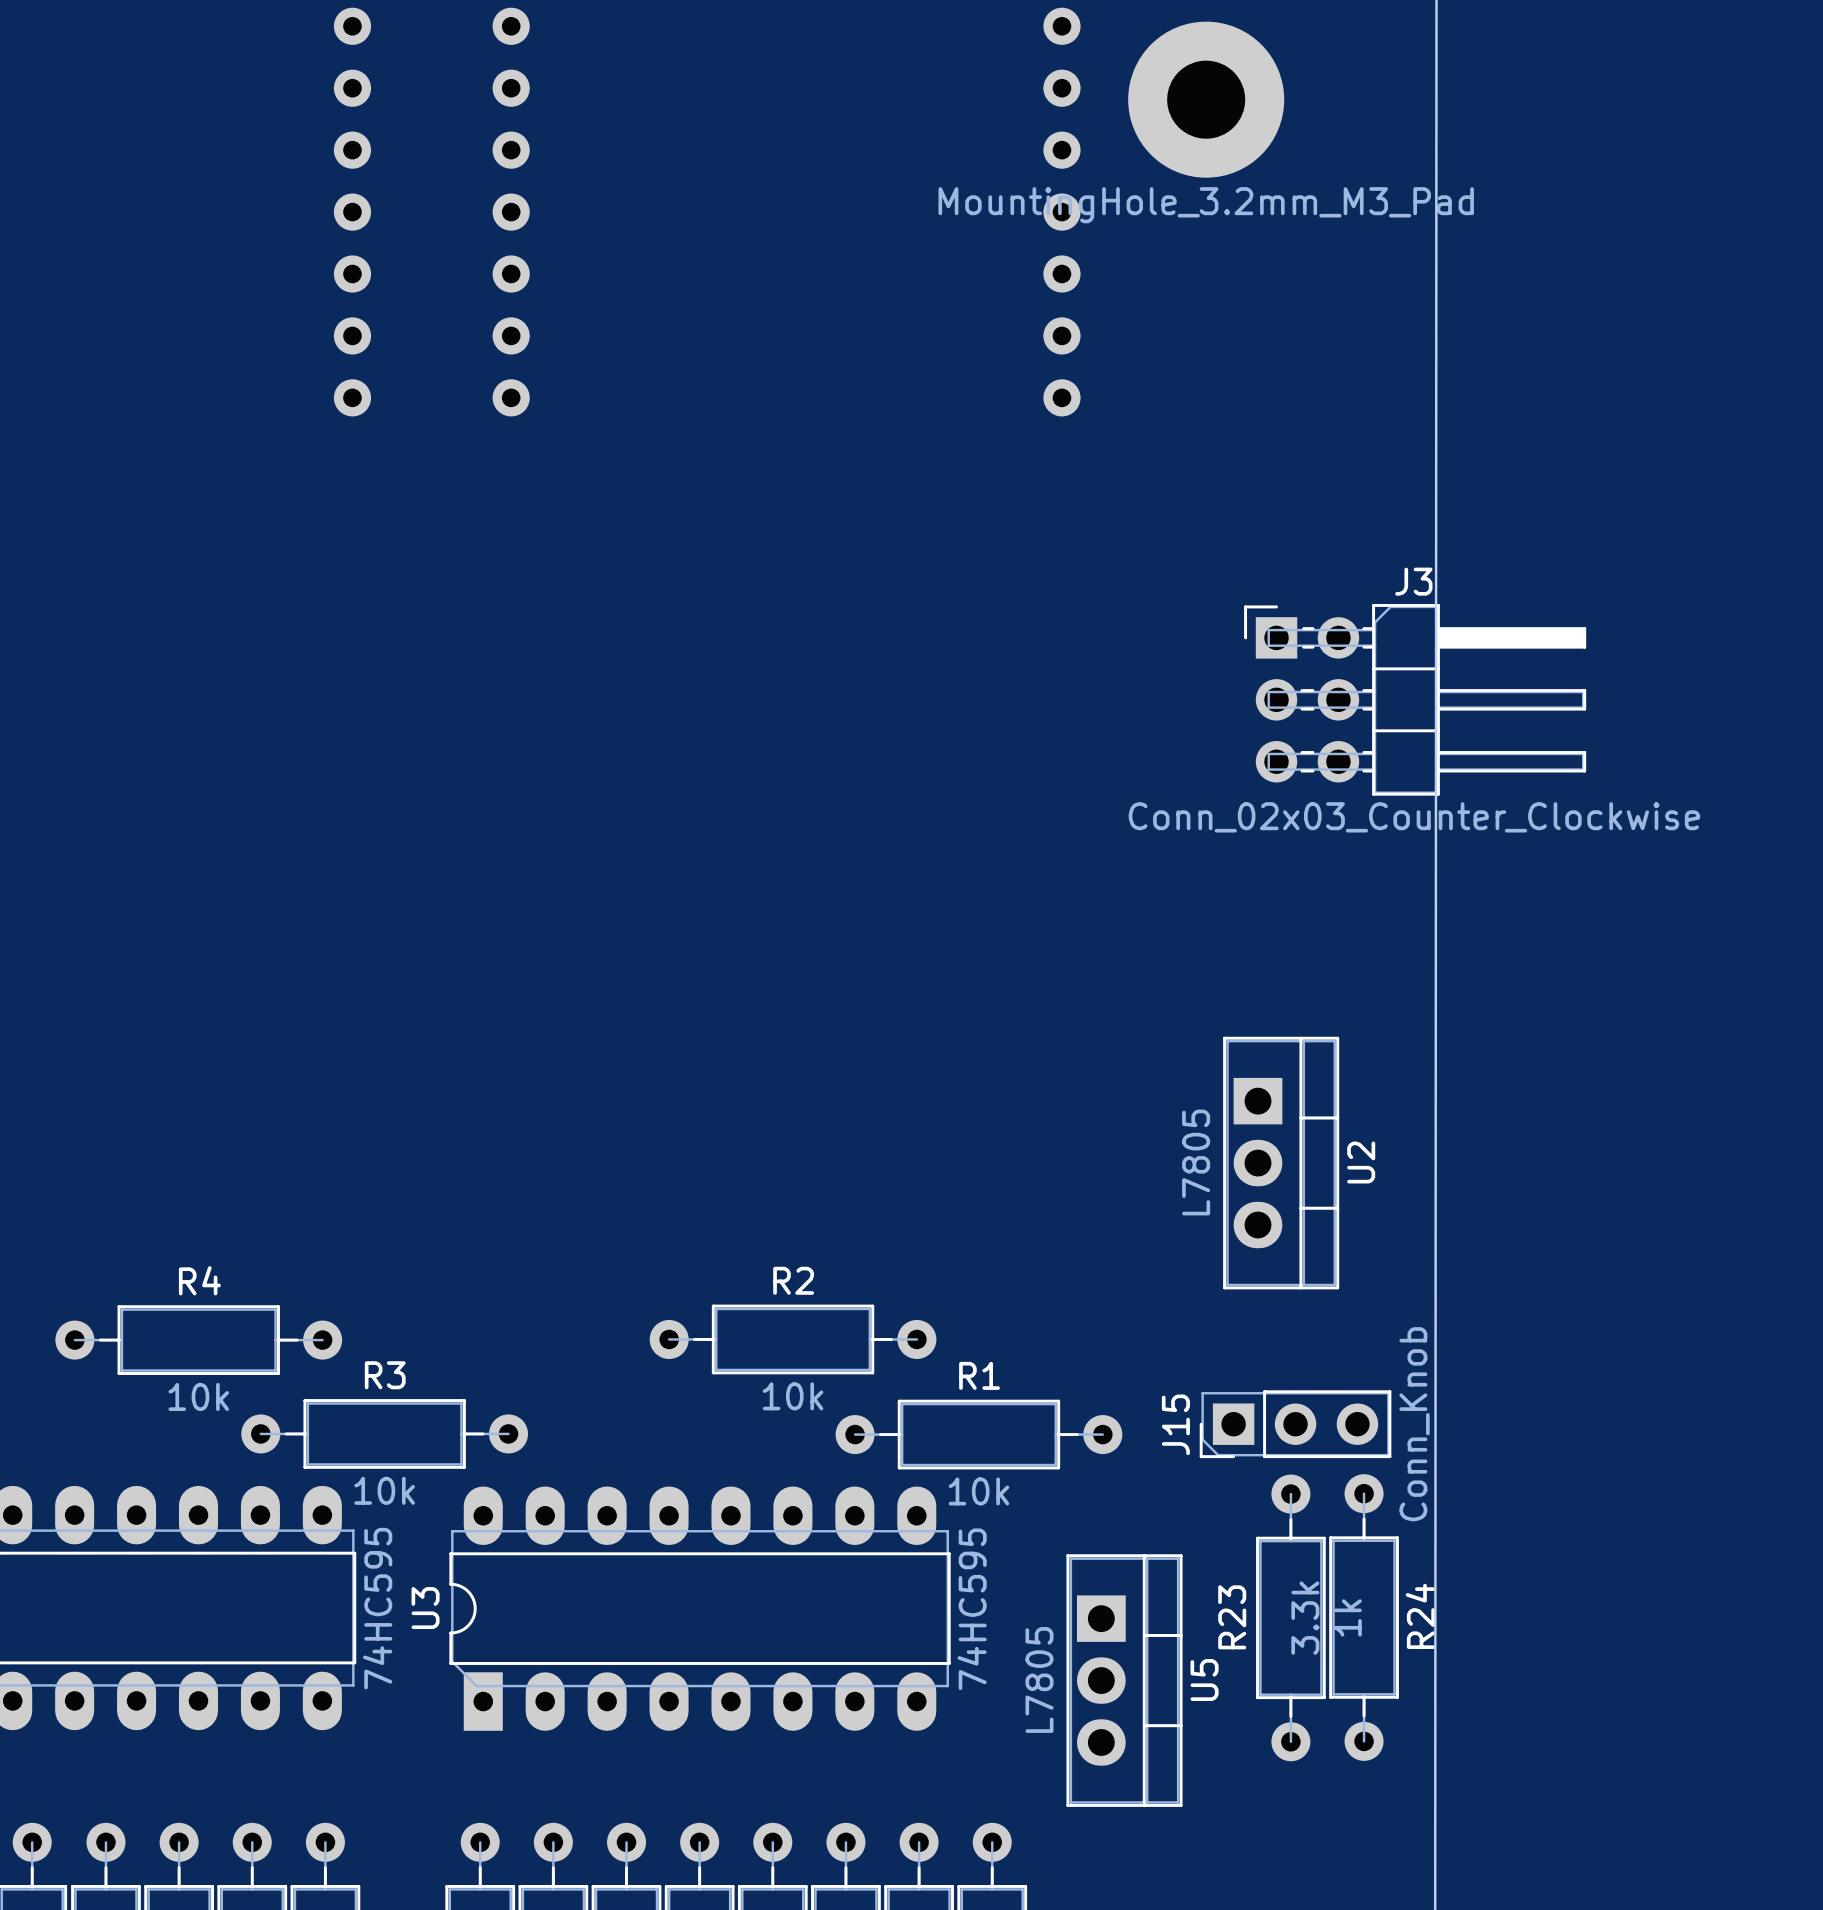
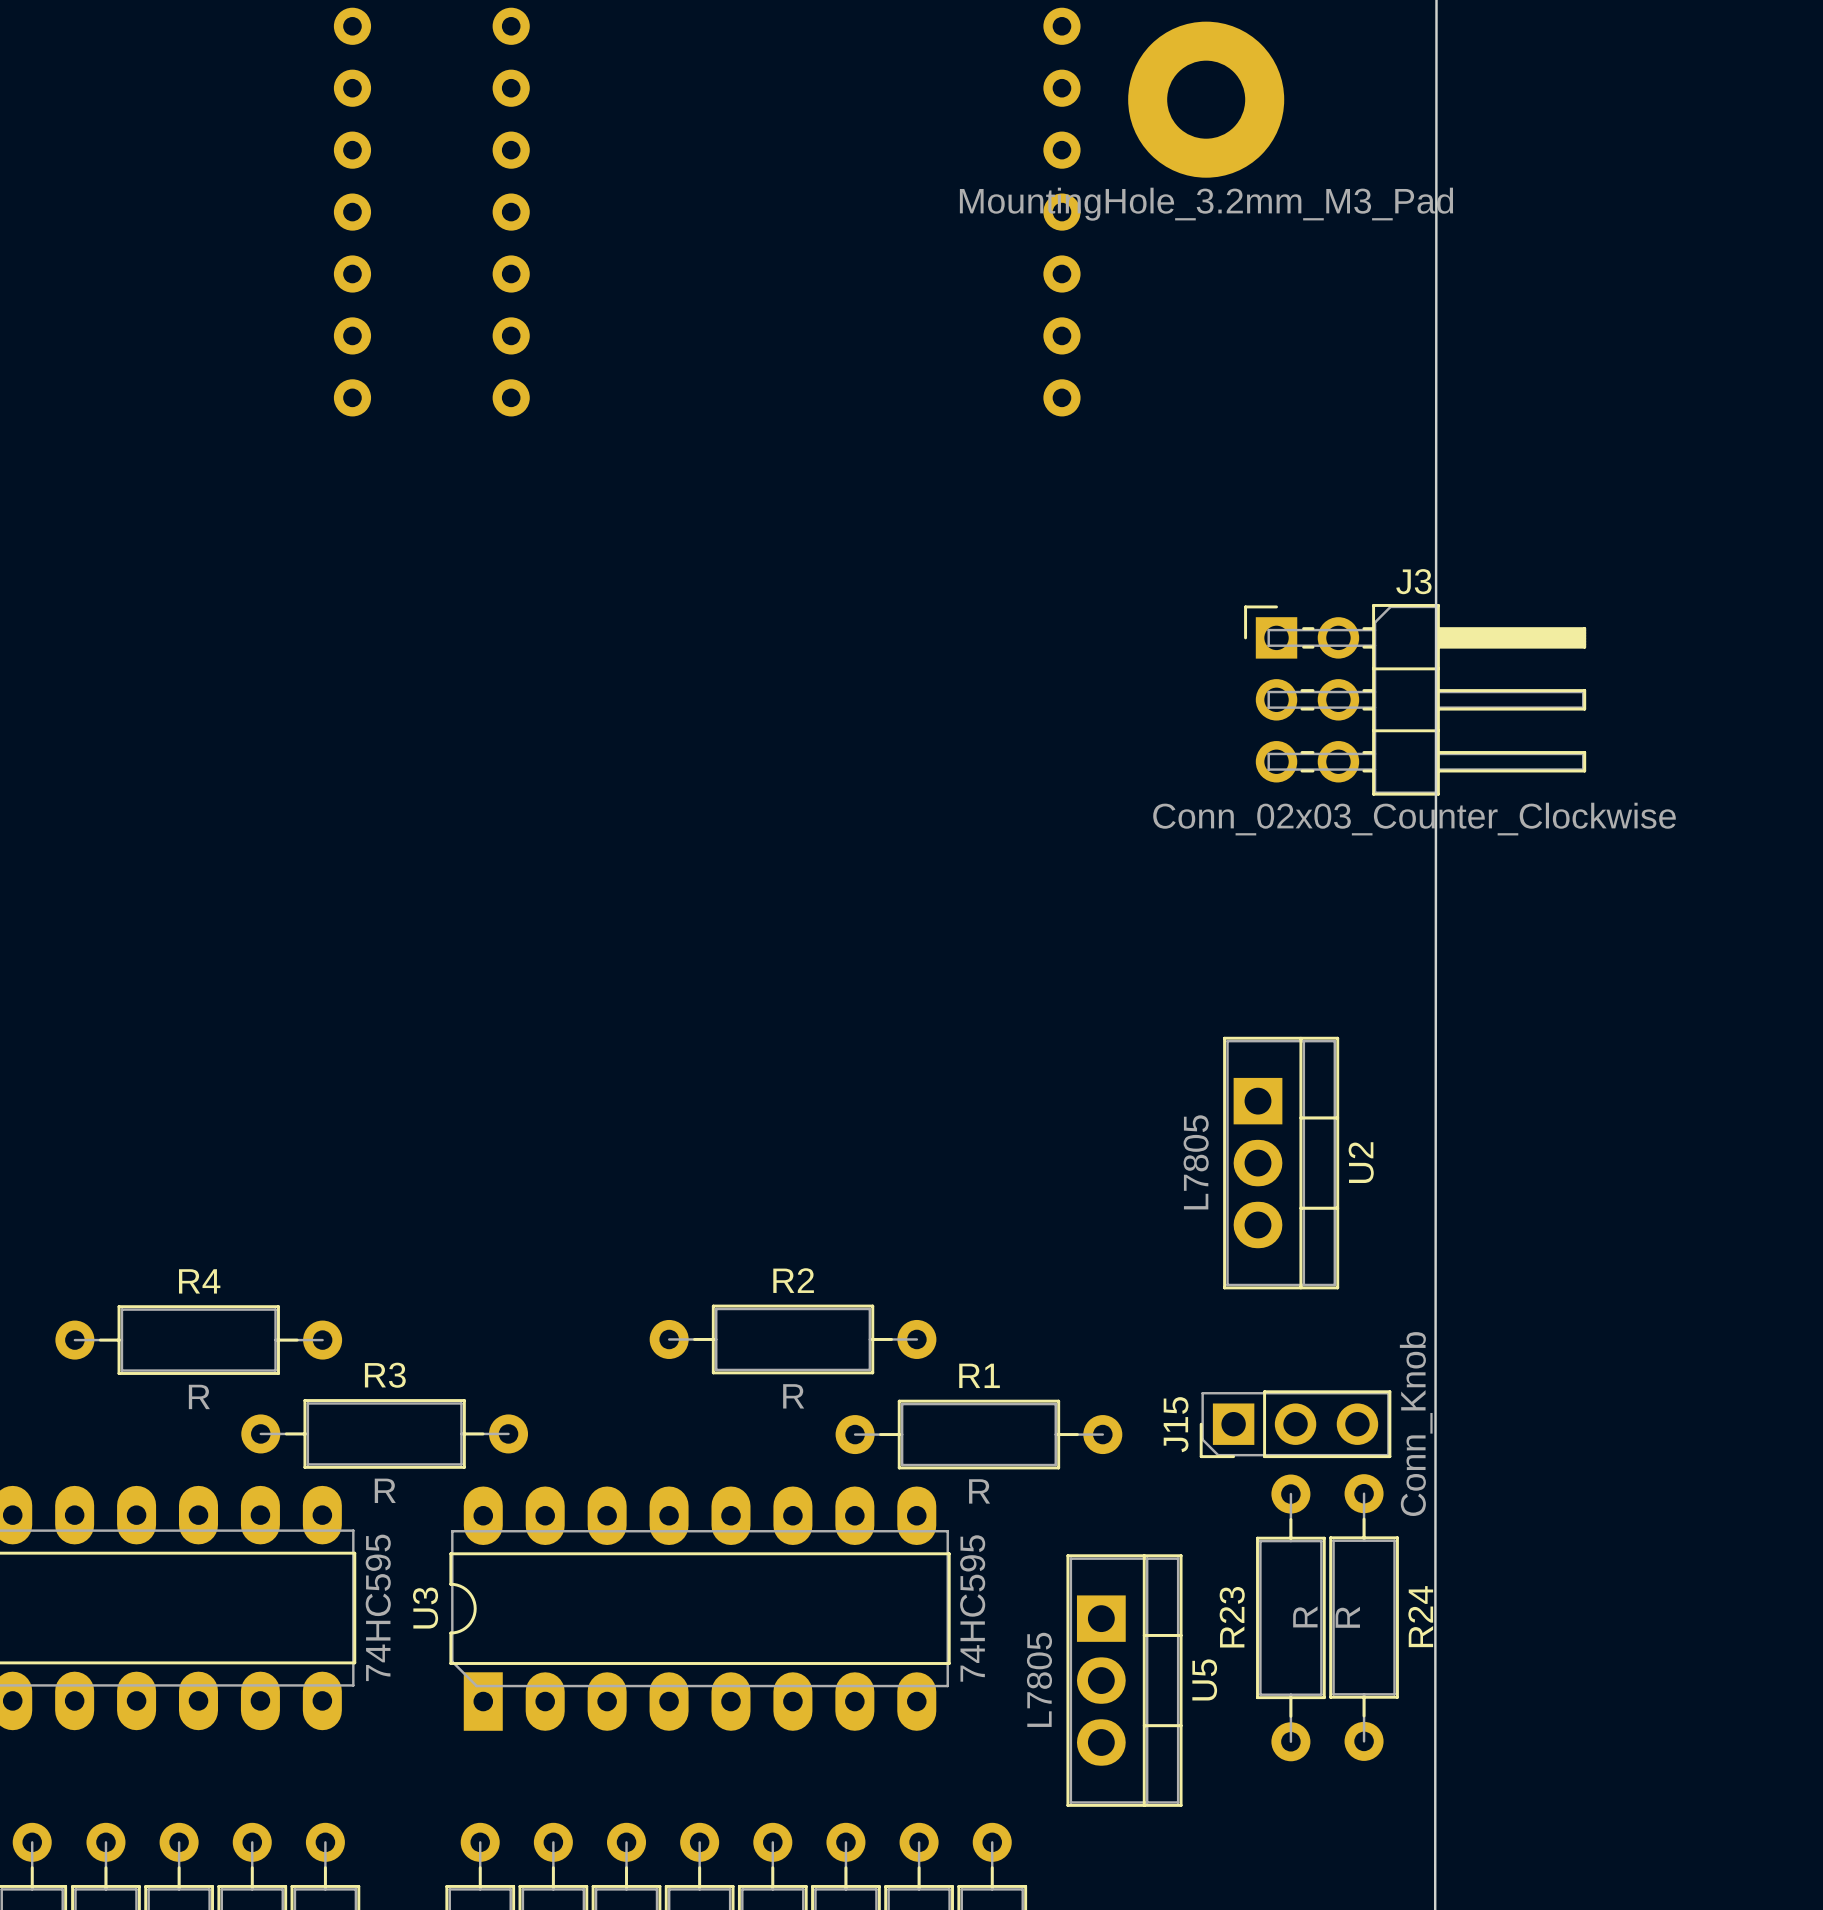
R4 value: 10k (198, 1396) -> R (199, 1396)
R2 value: 10k (793, 1396) -> R (793, 1396)
R3 value: 10k (384, 1490) -> R (385, 1490)
R1 value: 10k (978, 1491) -> R (979, 1491)
R23 value: 1k (1347, 1617) -> R (1347, 1617)
R24 value: 3.3k (1305, 1618) -> R (1305, 1616)

